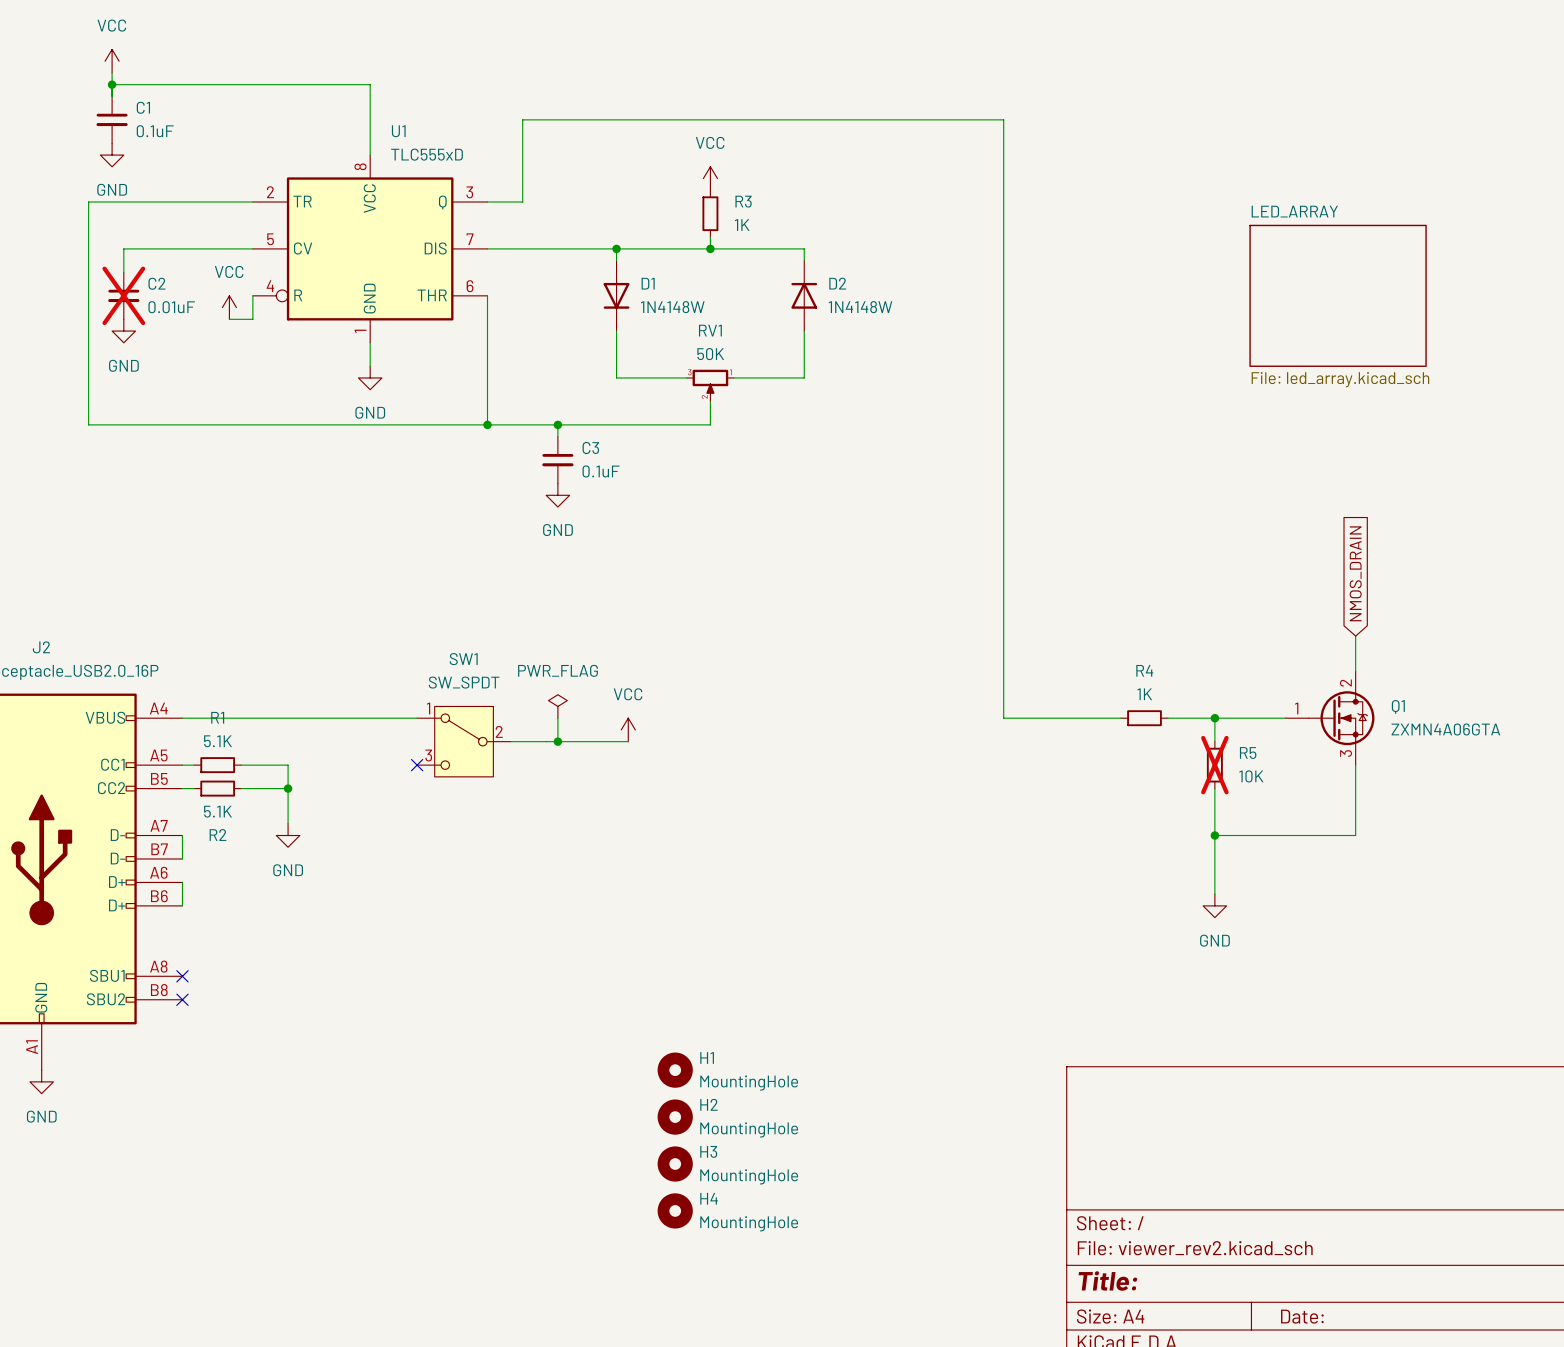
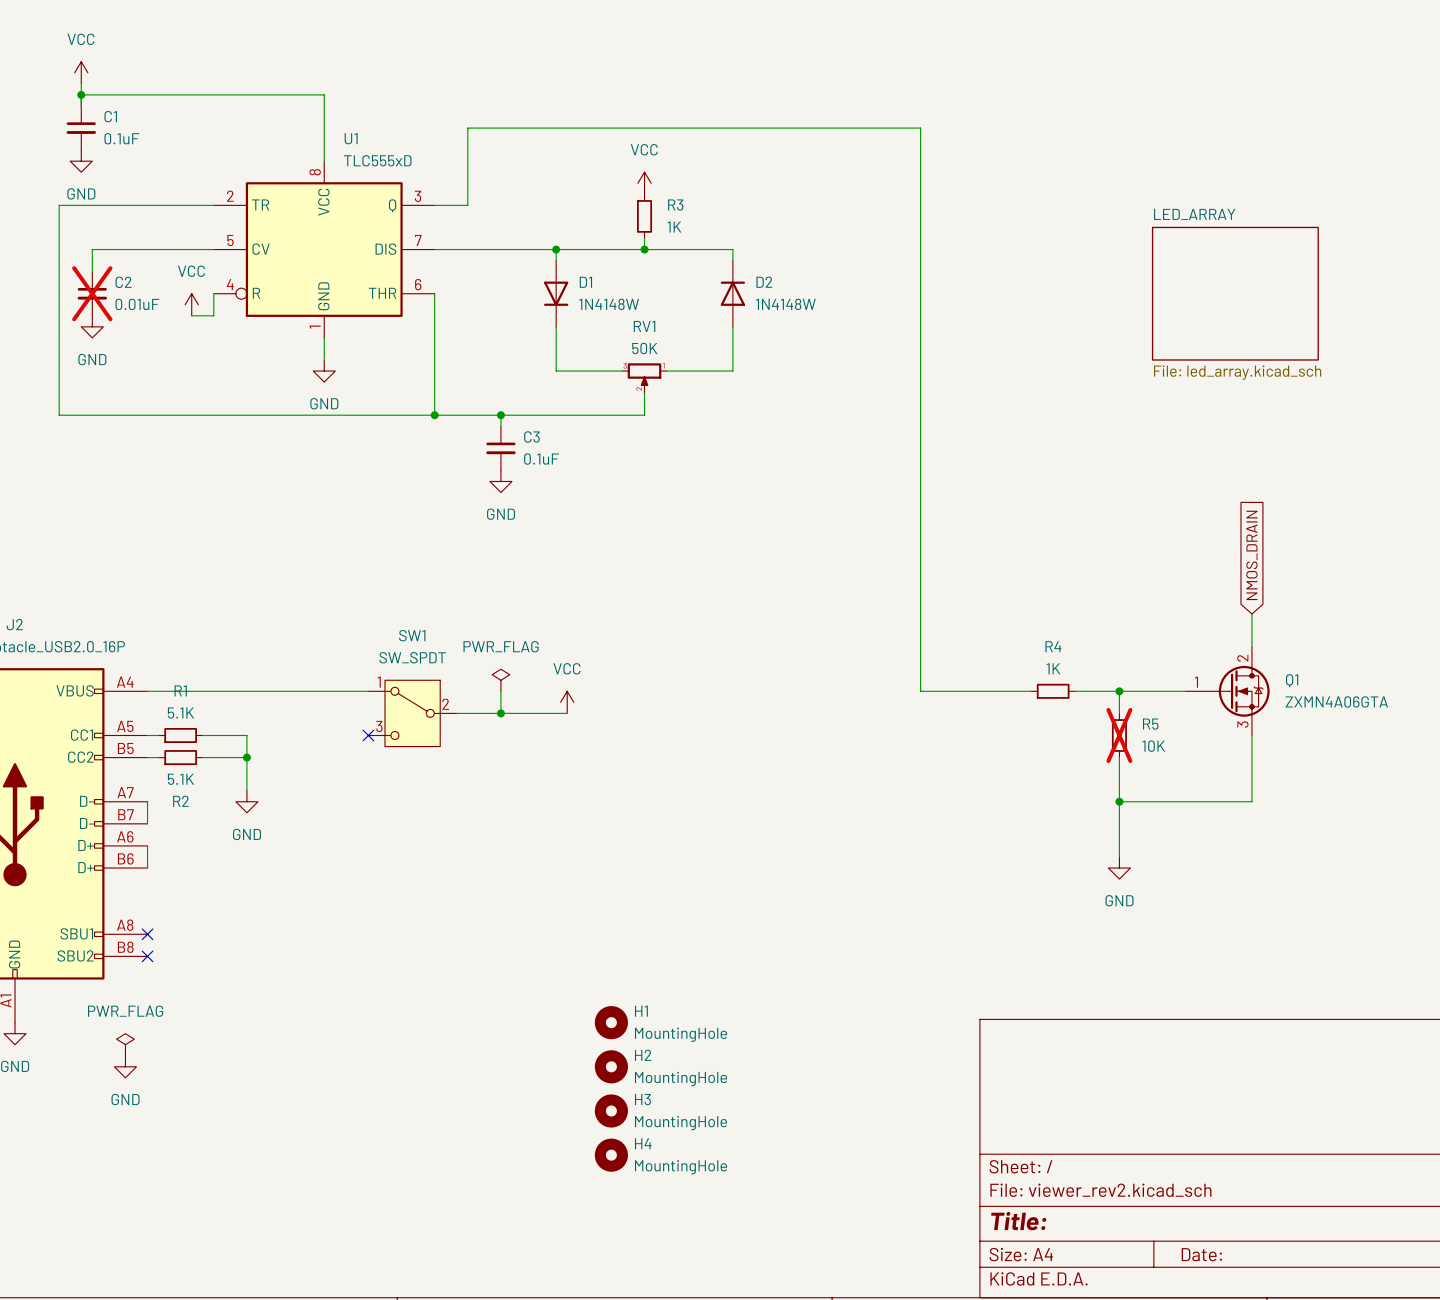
power symbol: none -> PWR_FLAG (125, 1044)
power symbol: none -> GND (125, 1066)

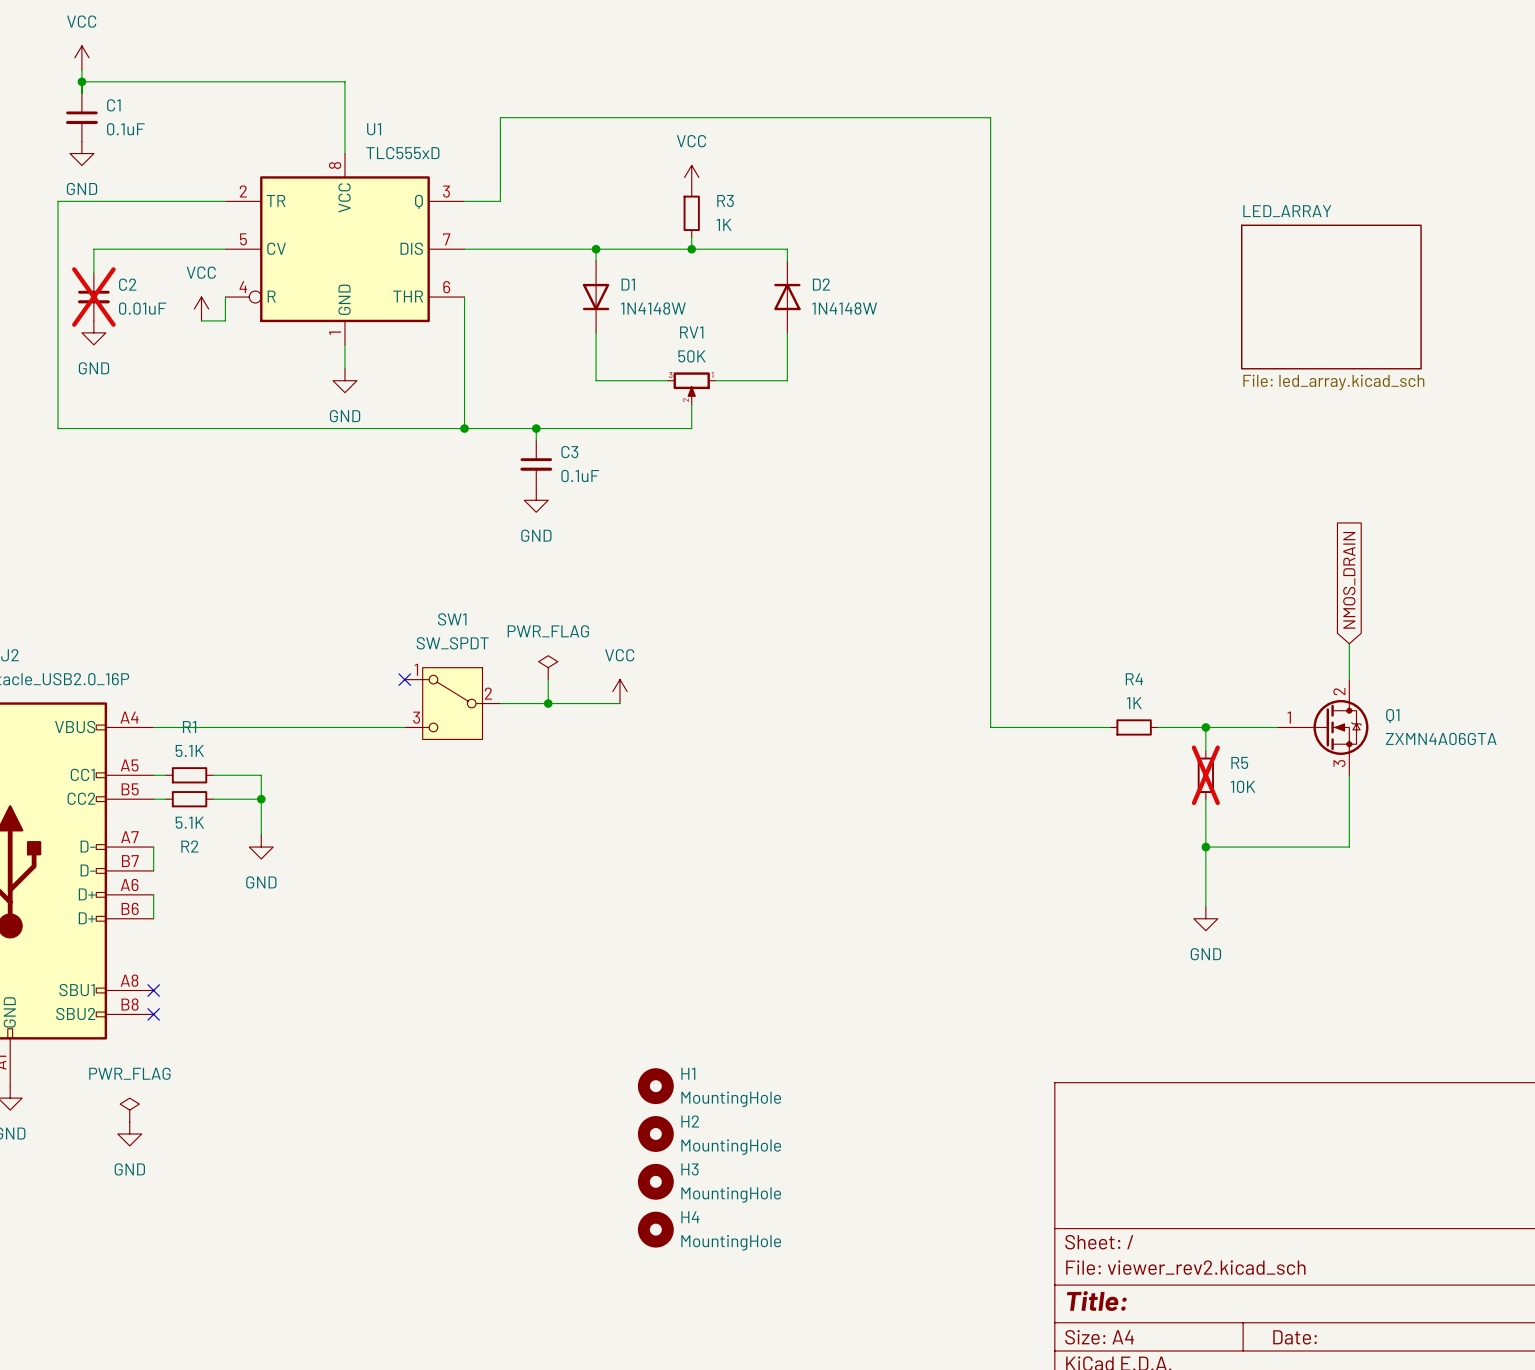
no-connect mark: none -> (404, 679)
power symbol position: PWR_FLAG (500, 680) -> PWR_FLAG (548, 667)
wire: (500, 691) (500, 713) -> (548, 679) (548, 703)
power symbol position: VCC (567, 702) -> VCC (619, 691)
SW1 position: (412, 713) -> (452, 703)
wire: (456, 713) (567, 713) -> (500, 703) (619, 703)
junction position: (500, 713) -> (548, 703)
no-connect mark: (368, 735) -> none

